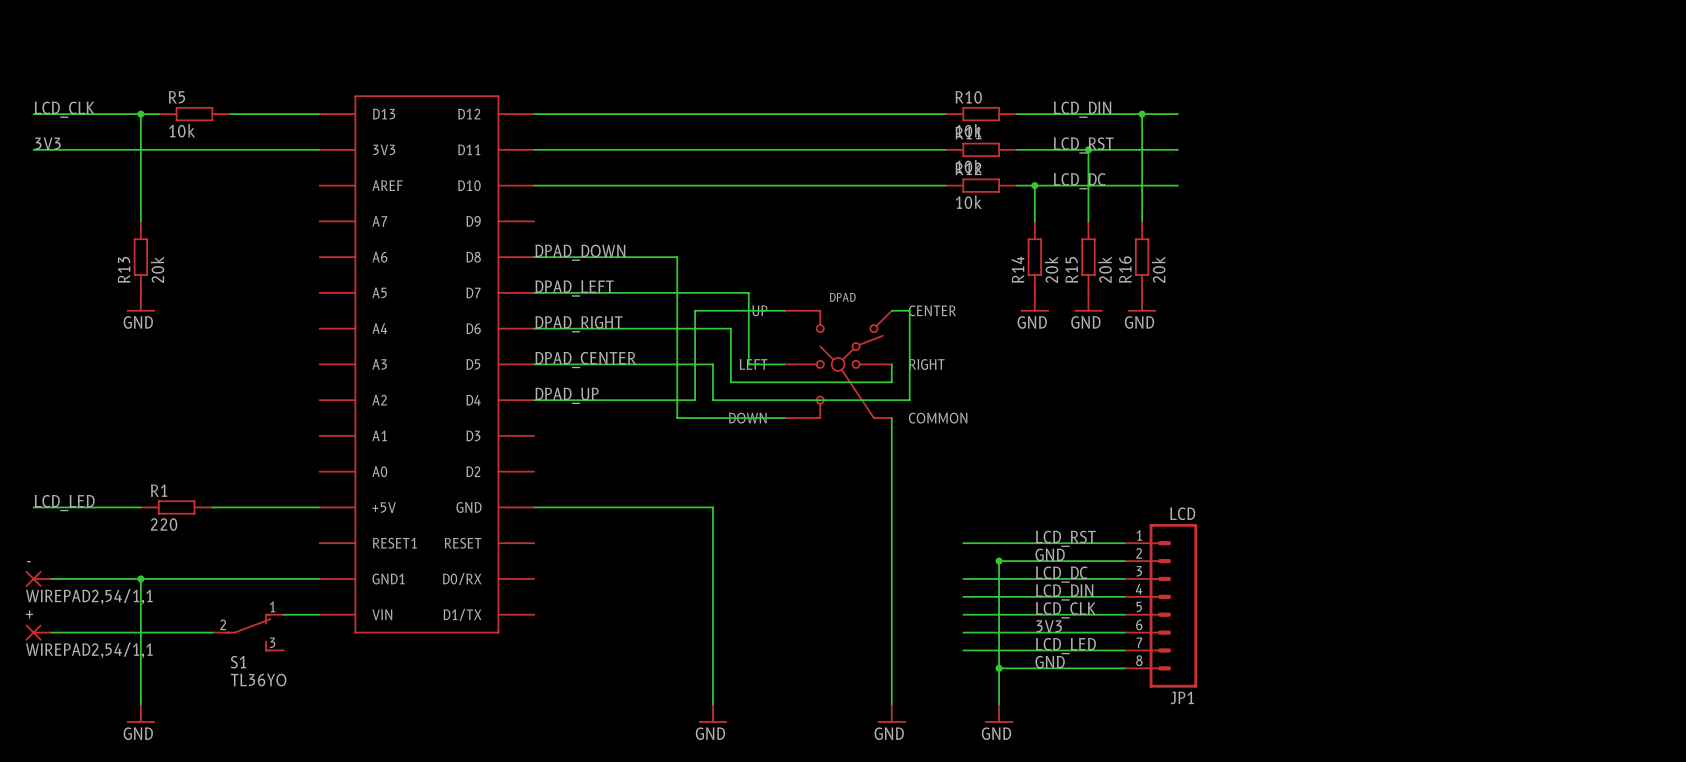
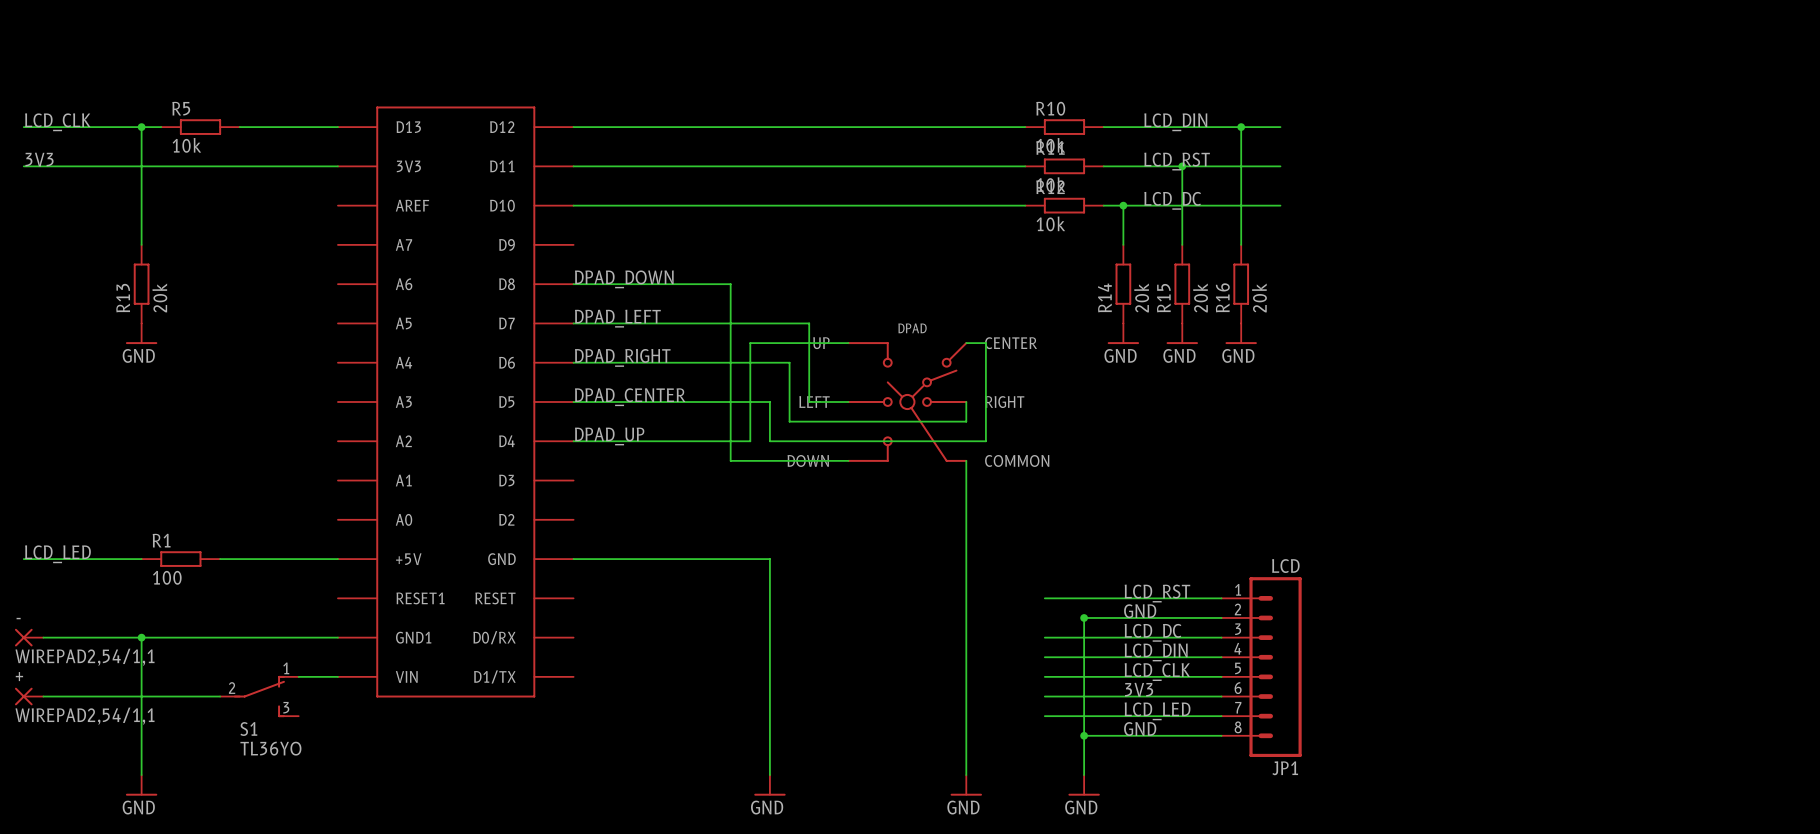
R1 value: 220 (164, 524) -> 100 (167, 577)

